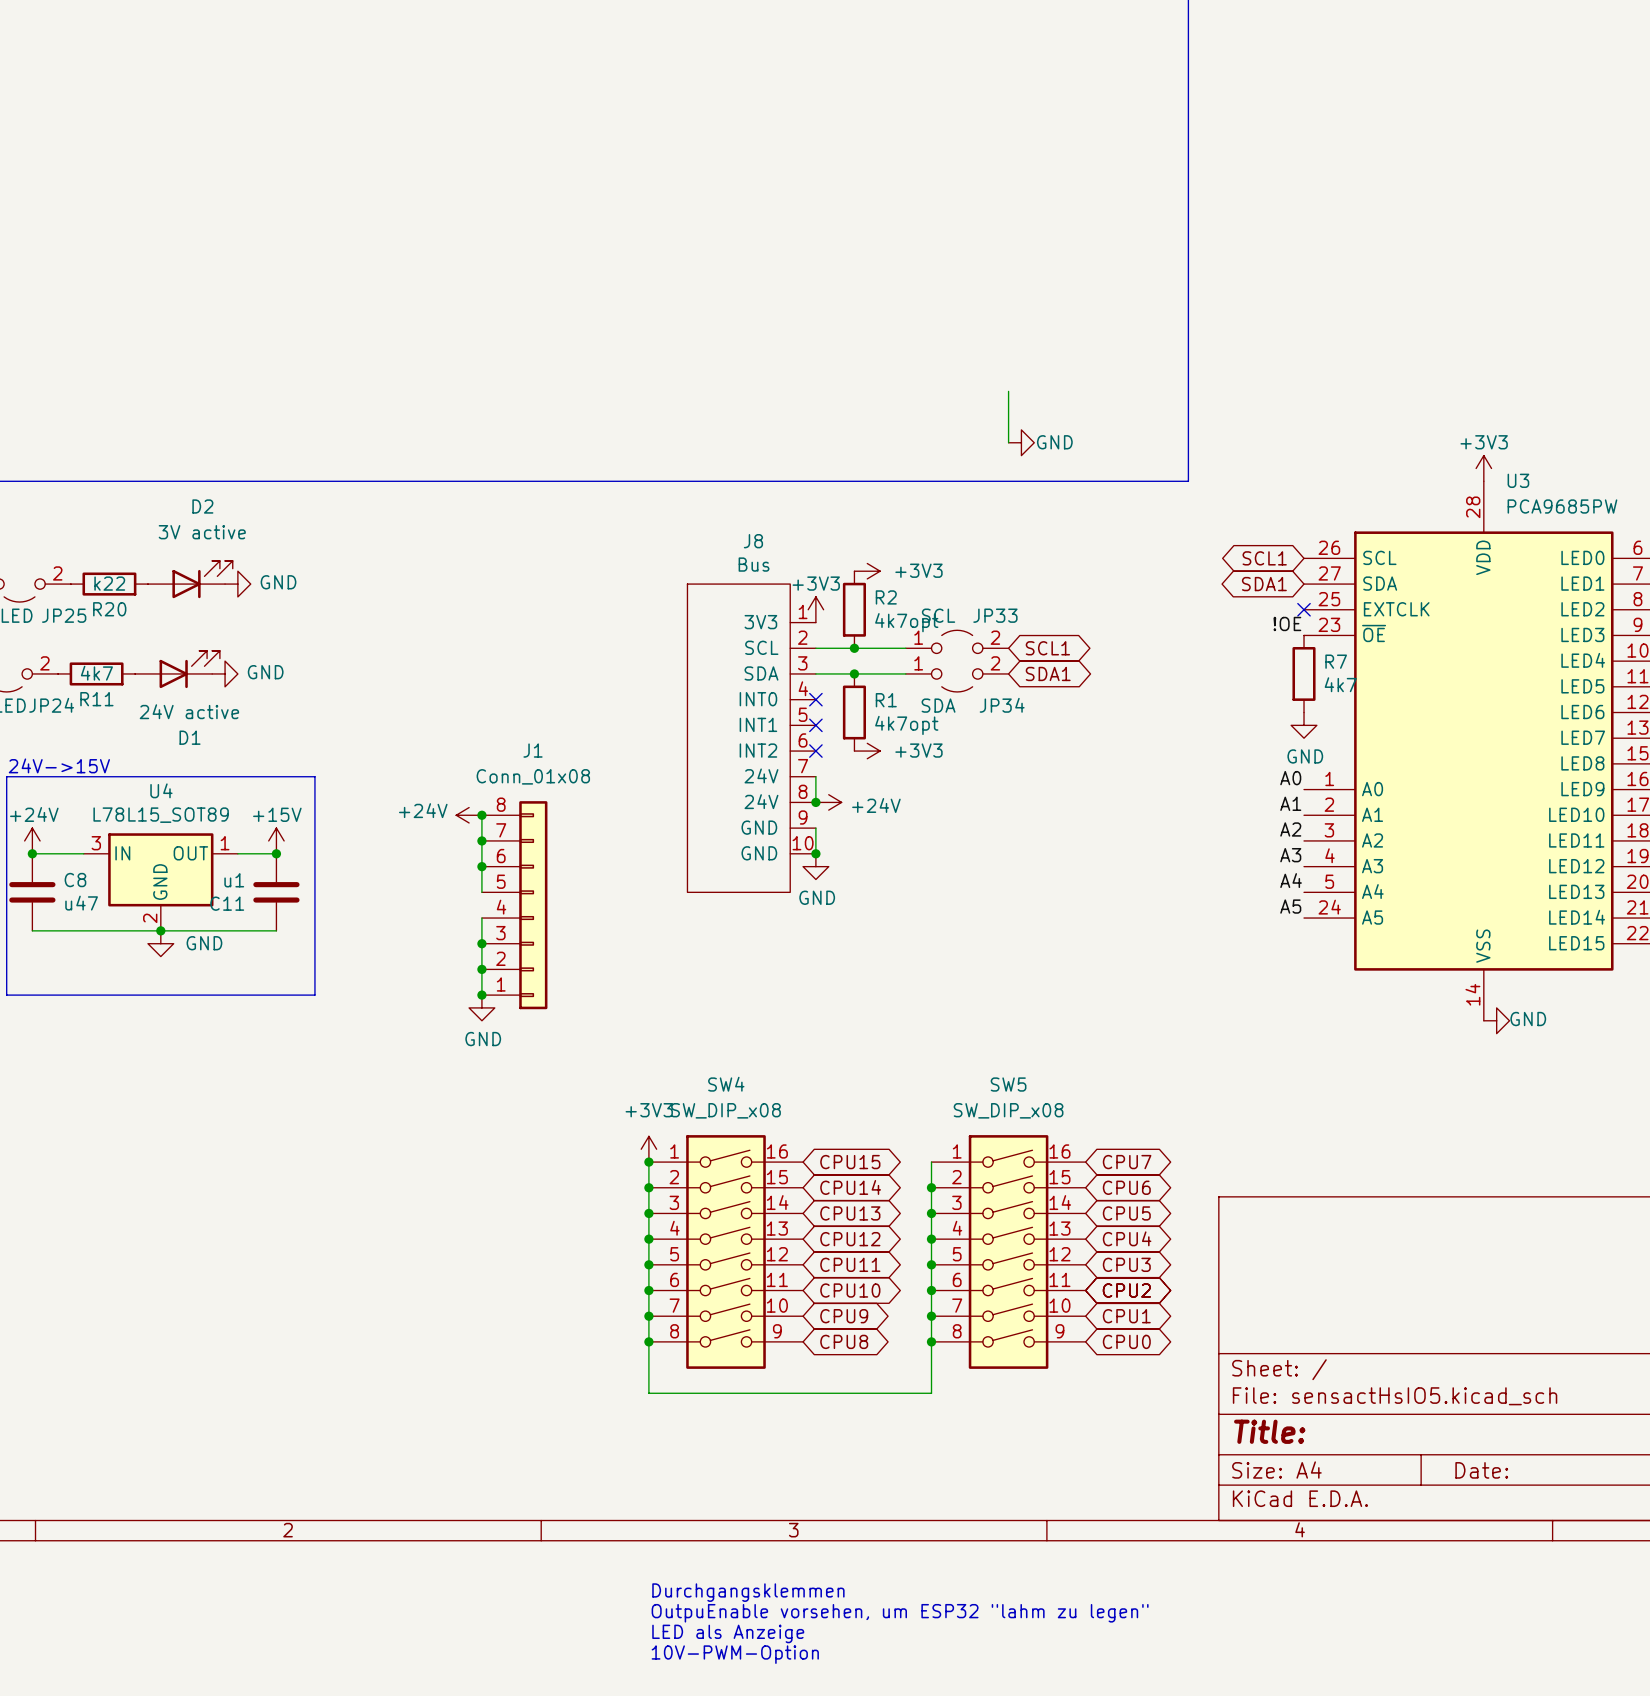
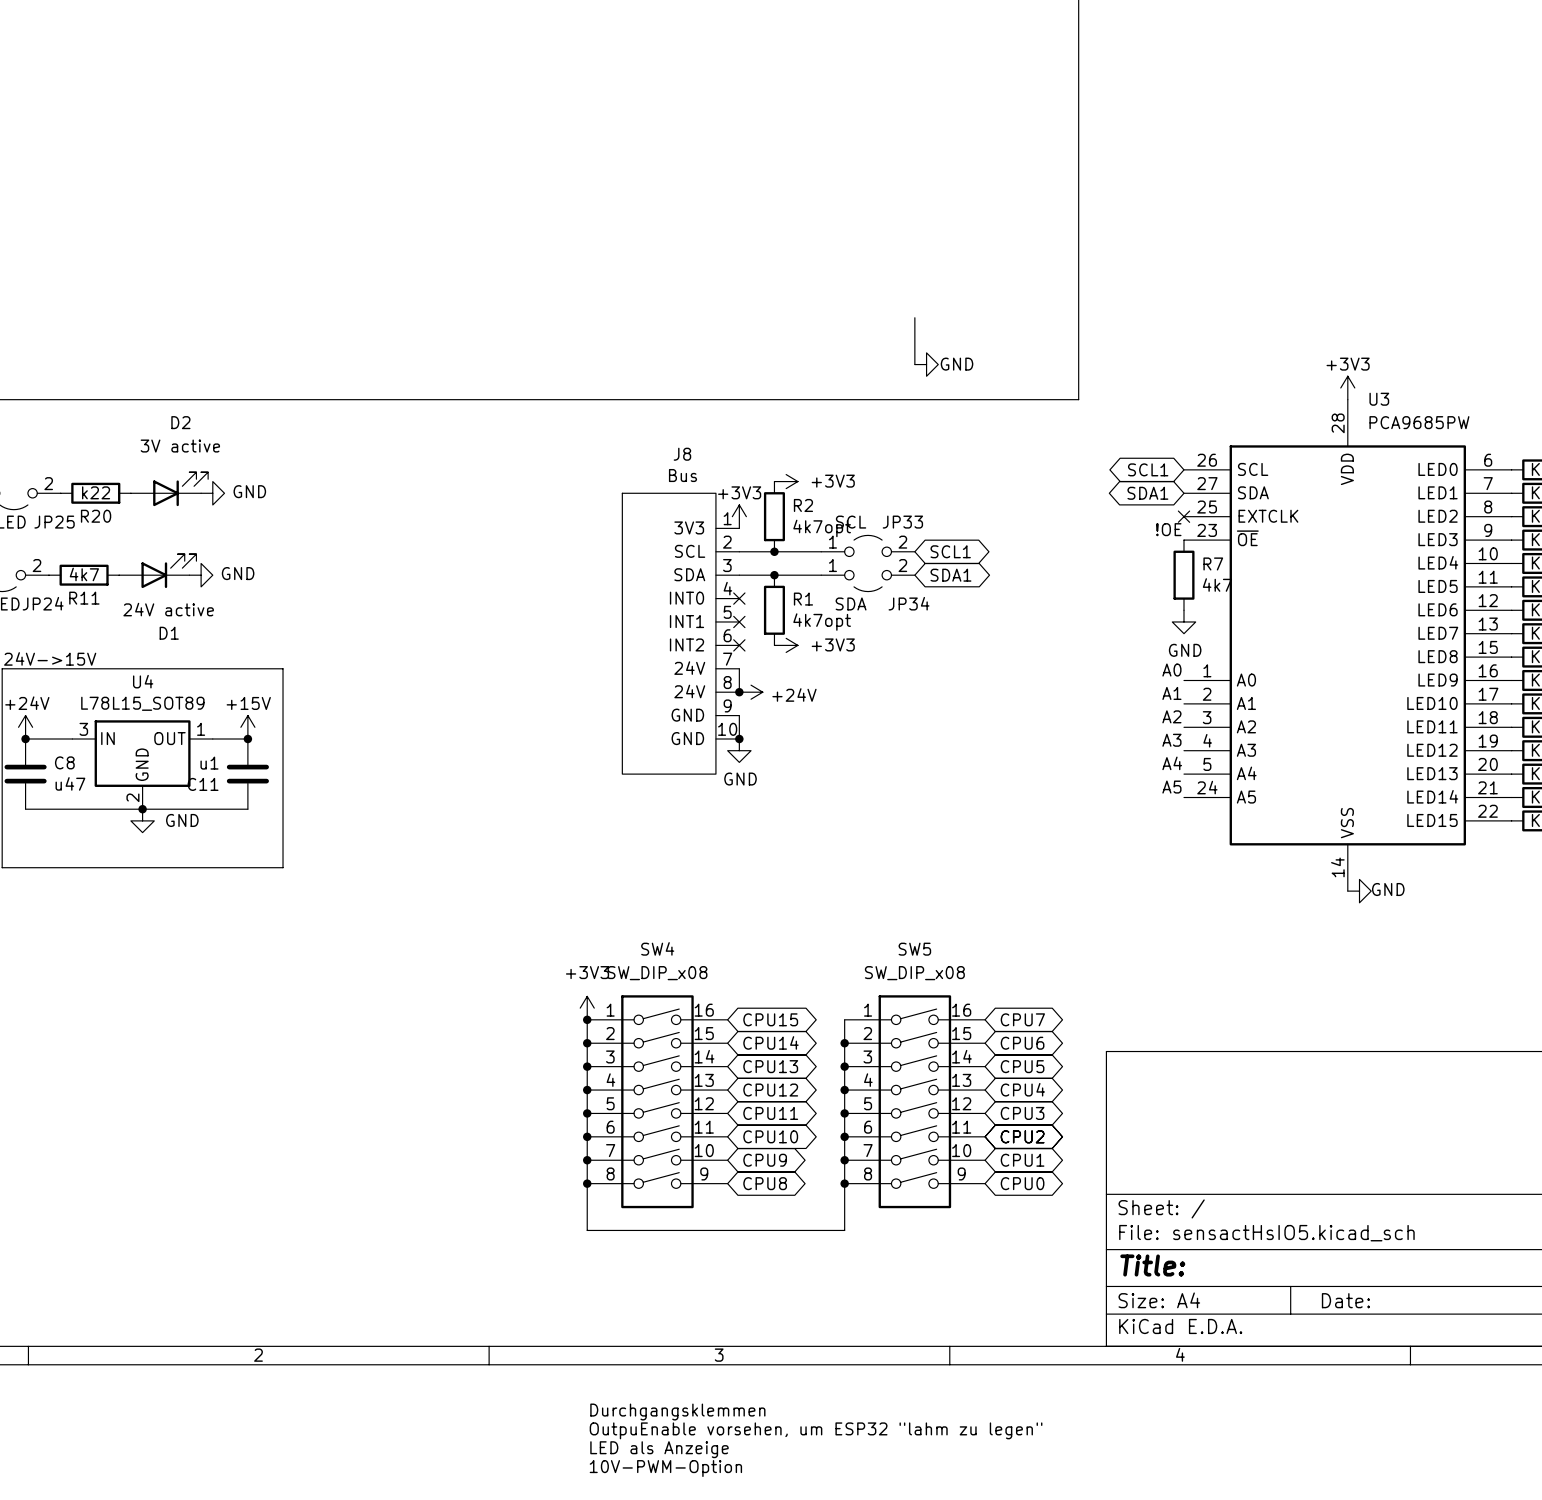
power symbol: +24V (469, 815) -> none
wire: (481, 815) (481, 892) -> none
junction: (481, 815) -> none
junction: (481, 840) -> none
junction: (481, 866) -> none
J1: Conn_01x08 (514, 905) -> none
wire: (481, 918) (481, 995) -> none
junction: (481, 943) -> none
junction: (481, 969) -> none
junction: (481, 995) -> none
power symbol: GND (481, 1007) -> none

